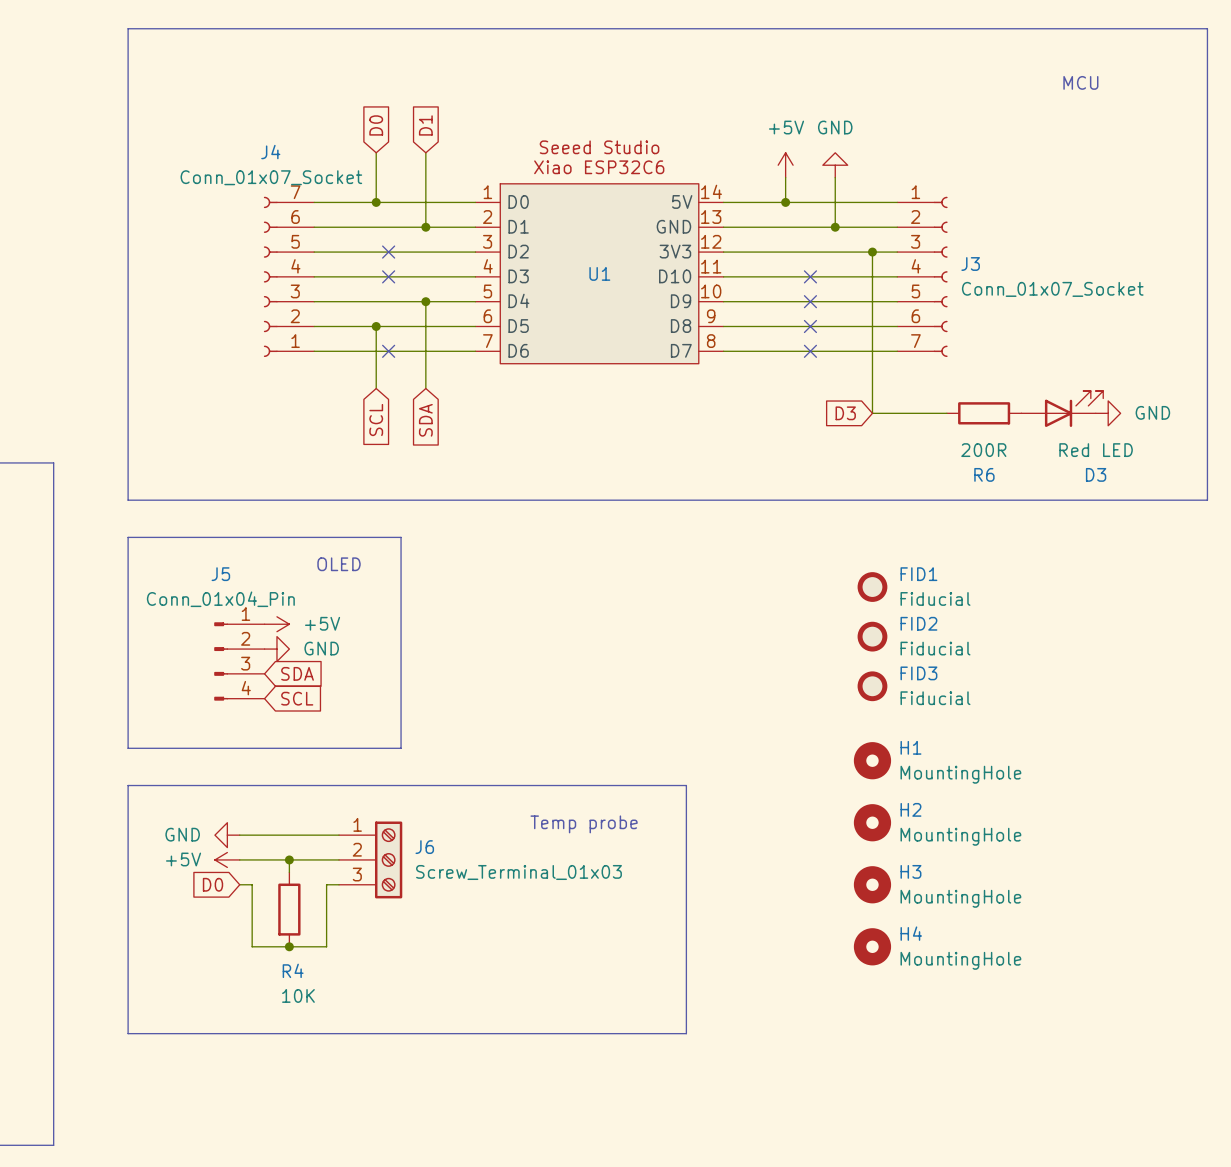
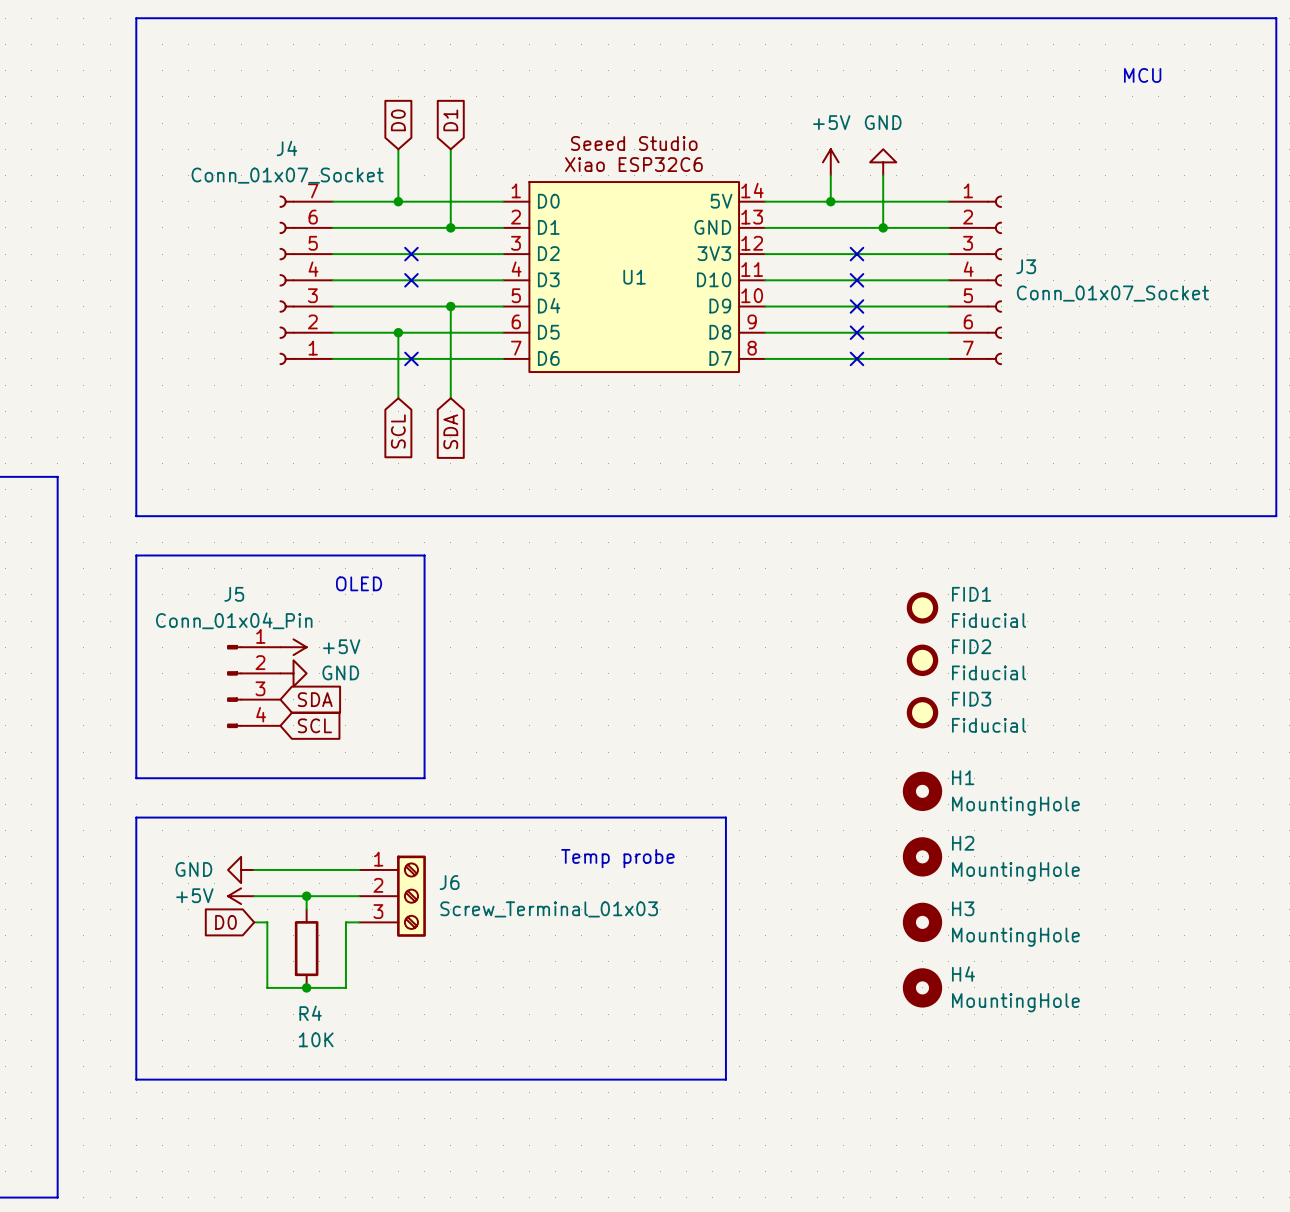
no-connect mark: none -> (856, 254)
wire: (872, 252) (872, 413) (946, 413) -> none
junction: (872, 252) -> none
D3: Red LED (1062, 408) -> none
global label: D3 (845, 413) -> none
R6: 200R (984, 413) -> none
power symbol: GND (1108, 413) -> none

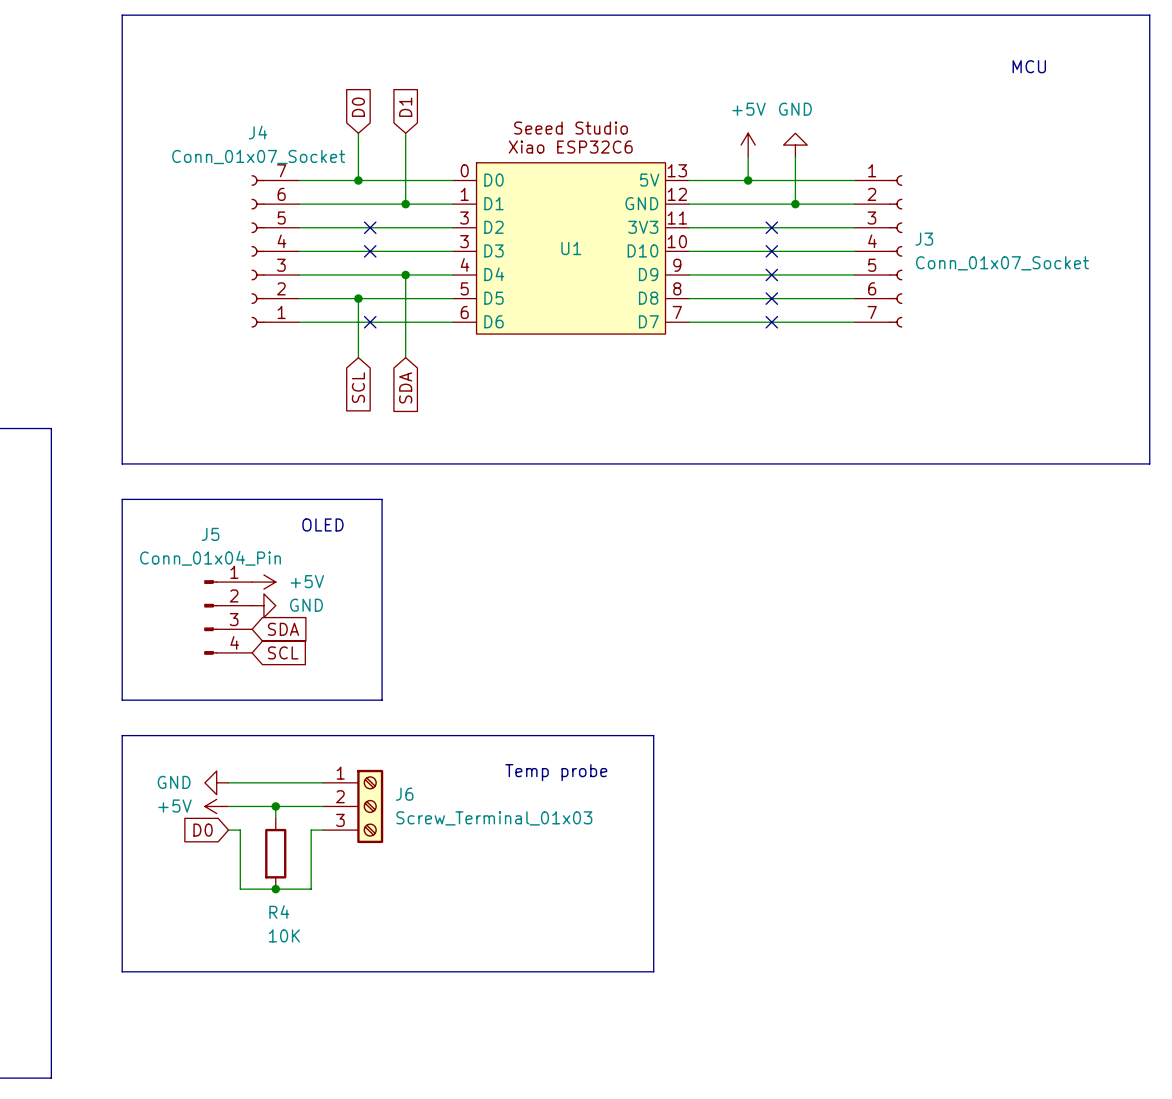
U1 symbol: [503, 182, 766, 373] -> [452, 162, 690, 335]
FID1: Fiducial (922, 607) -> none
FID2: Fiducial (922, 660) -> none
FID3: Fiducial (922, 712) -> none
H1: MountingHole (922, 791) -> none
H2: MountingHole (922, 856) -> none
H3: MountingHole (922, 922) -> none
H4: MountingHole (922, 987) -> none

